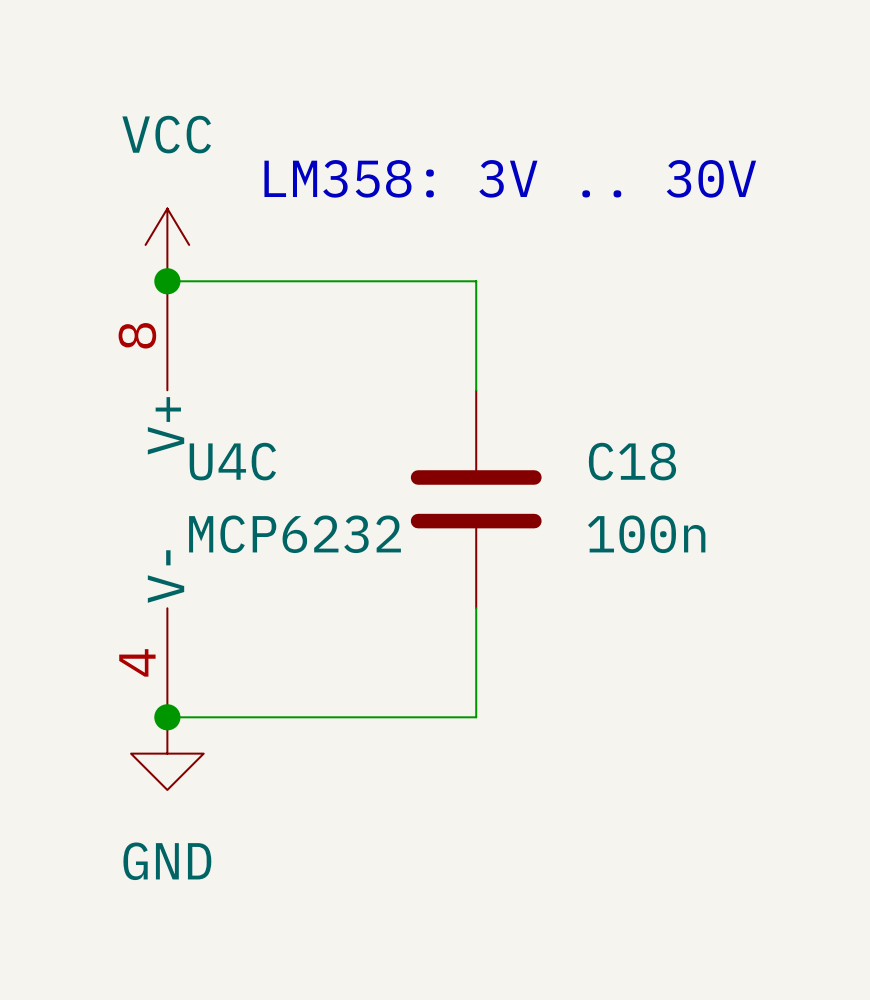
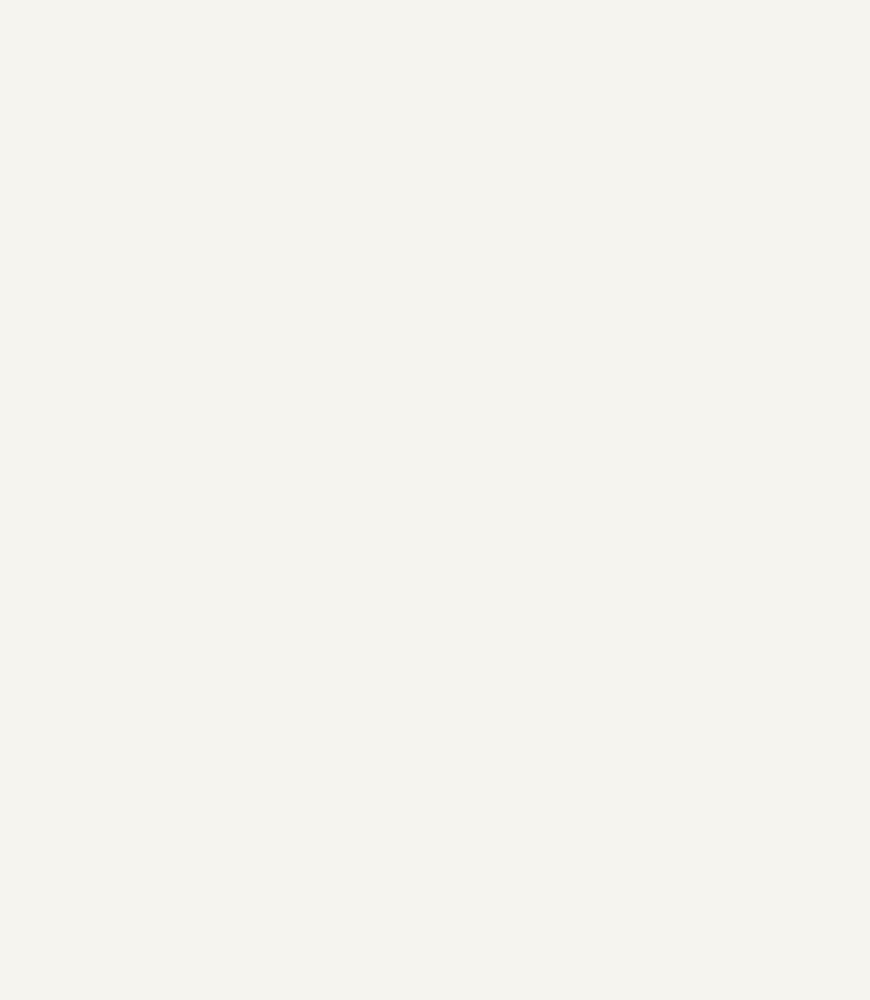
text: LM358: 3V .. 30V (510, 178) -> none
power symbol: VCC (167, 244) -> none
wire: (167, 281) (476, 281) (476, 390) -> none
junction: (167, 281) -> none
U4C: MCP6232 (167, 499) -> none
C18: 100n (476, 499) -> none
wire: (476, 608) (476, 717) (167, 717) -> none
junction: (167, 717) -> none
power symbol: GND (167, 753) -> none

